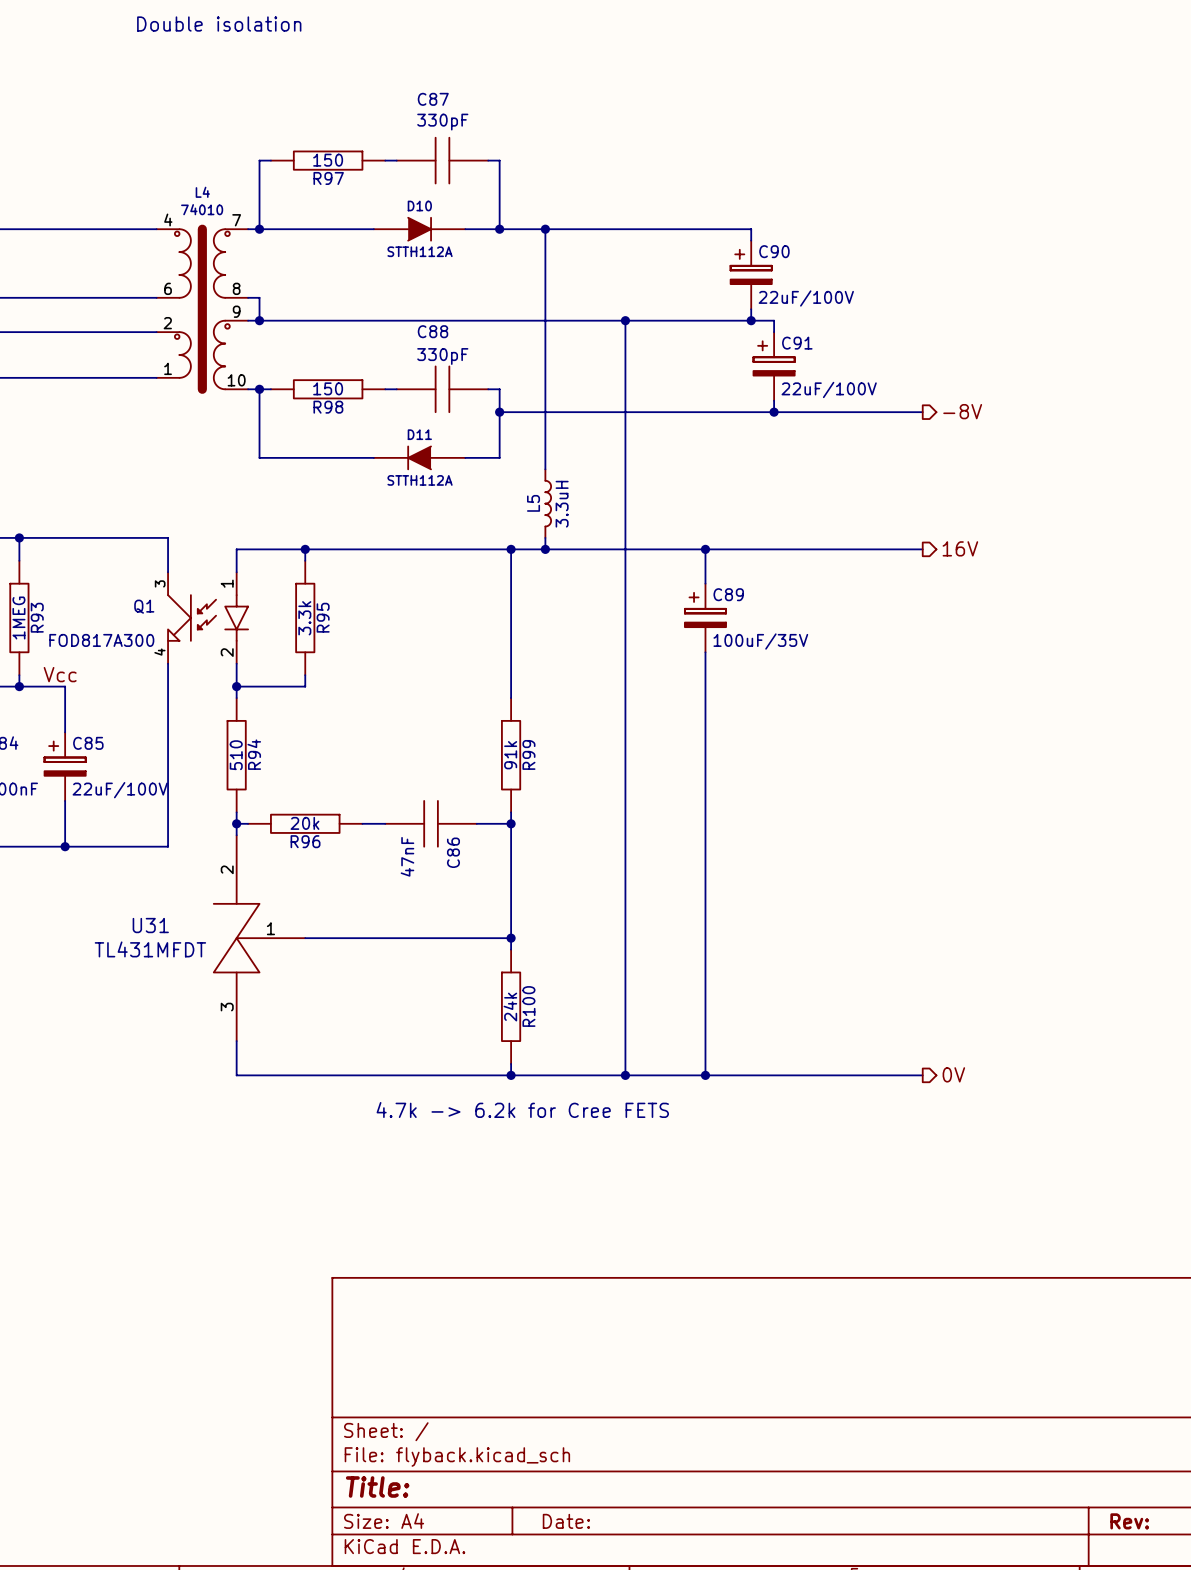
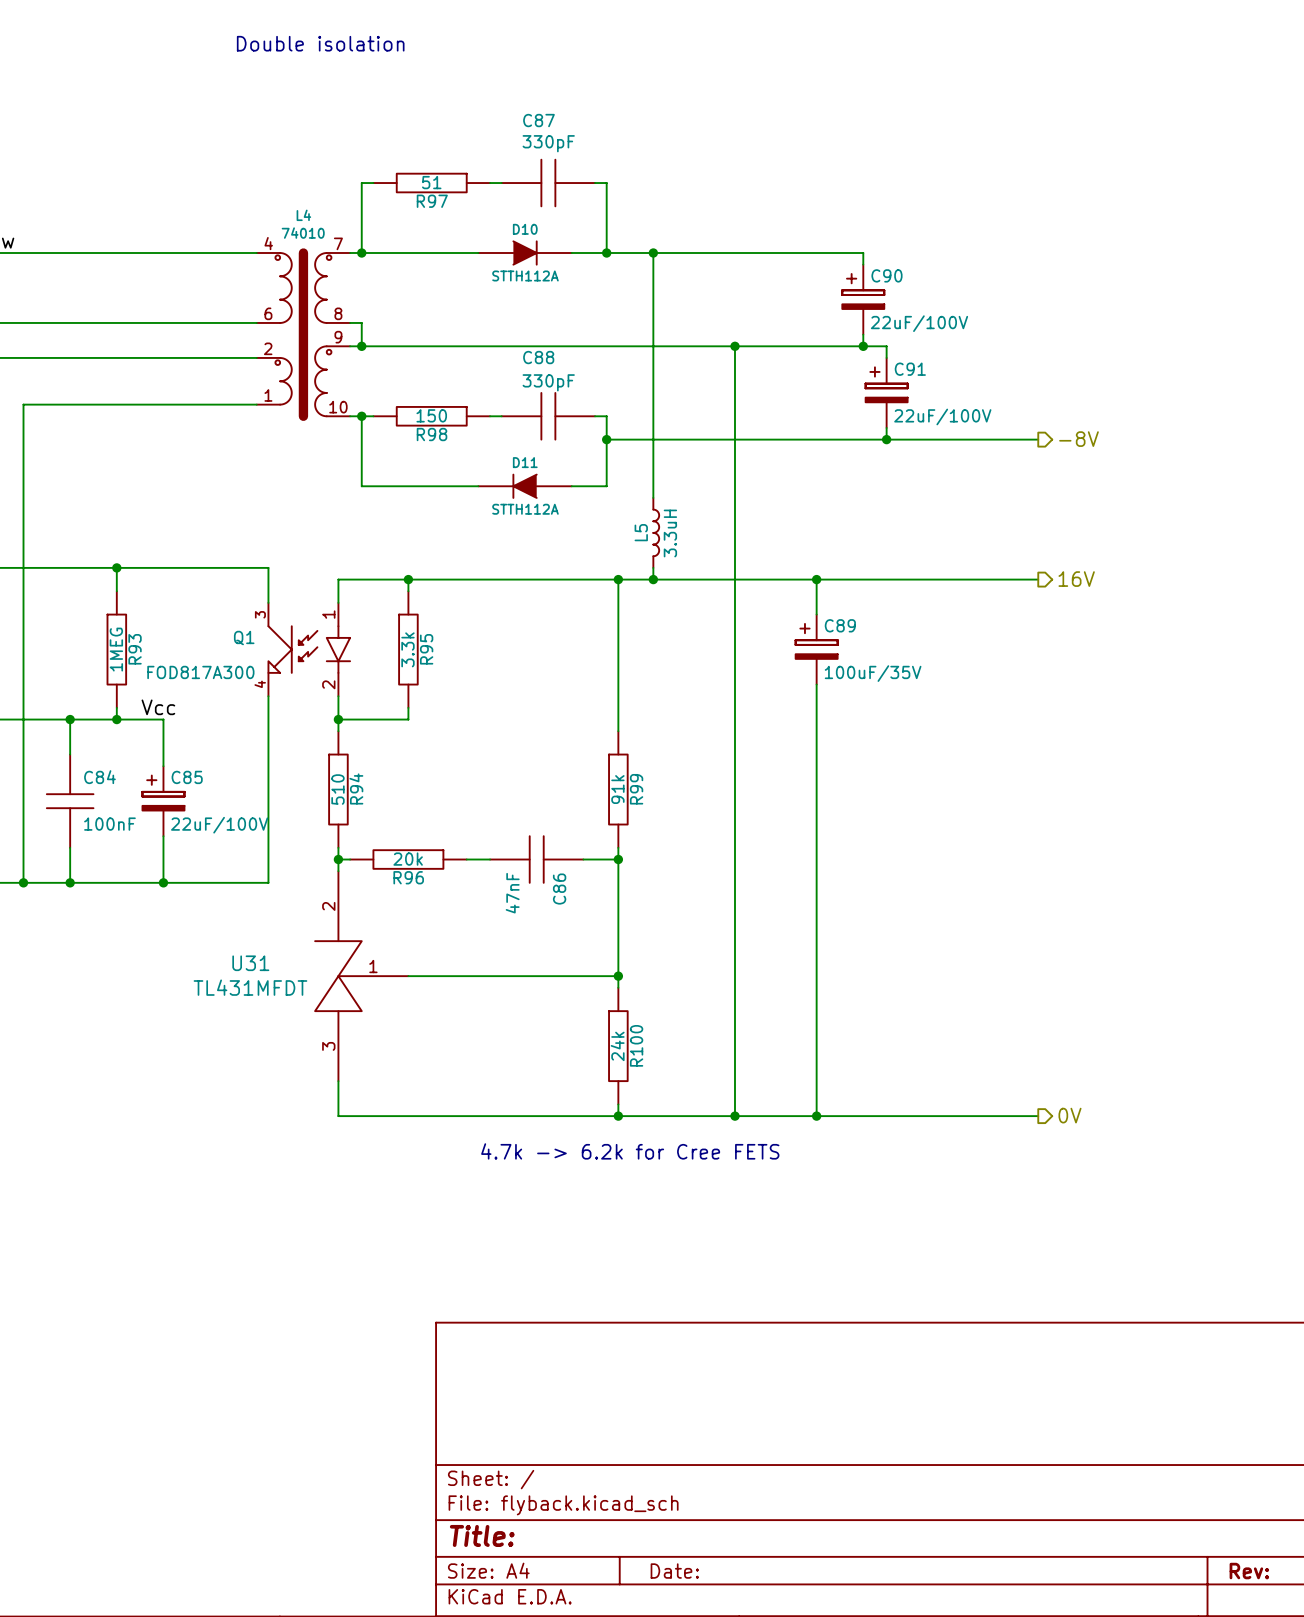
R97 value: 150 (328, 160) -> 51 (431, 182)

